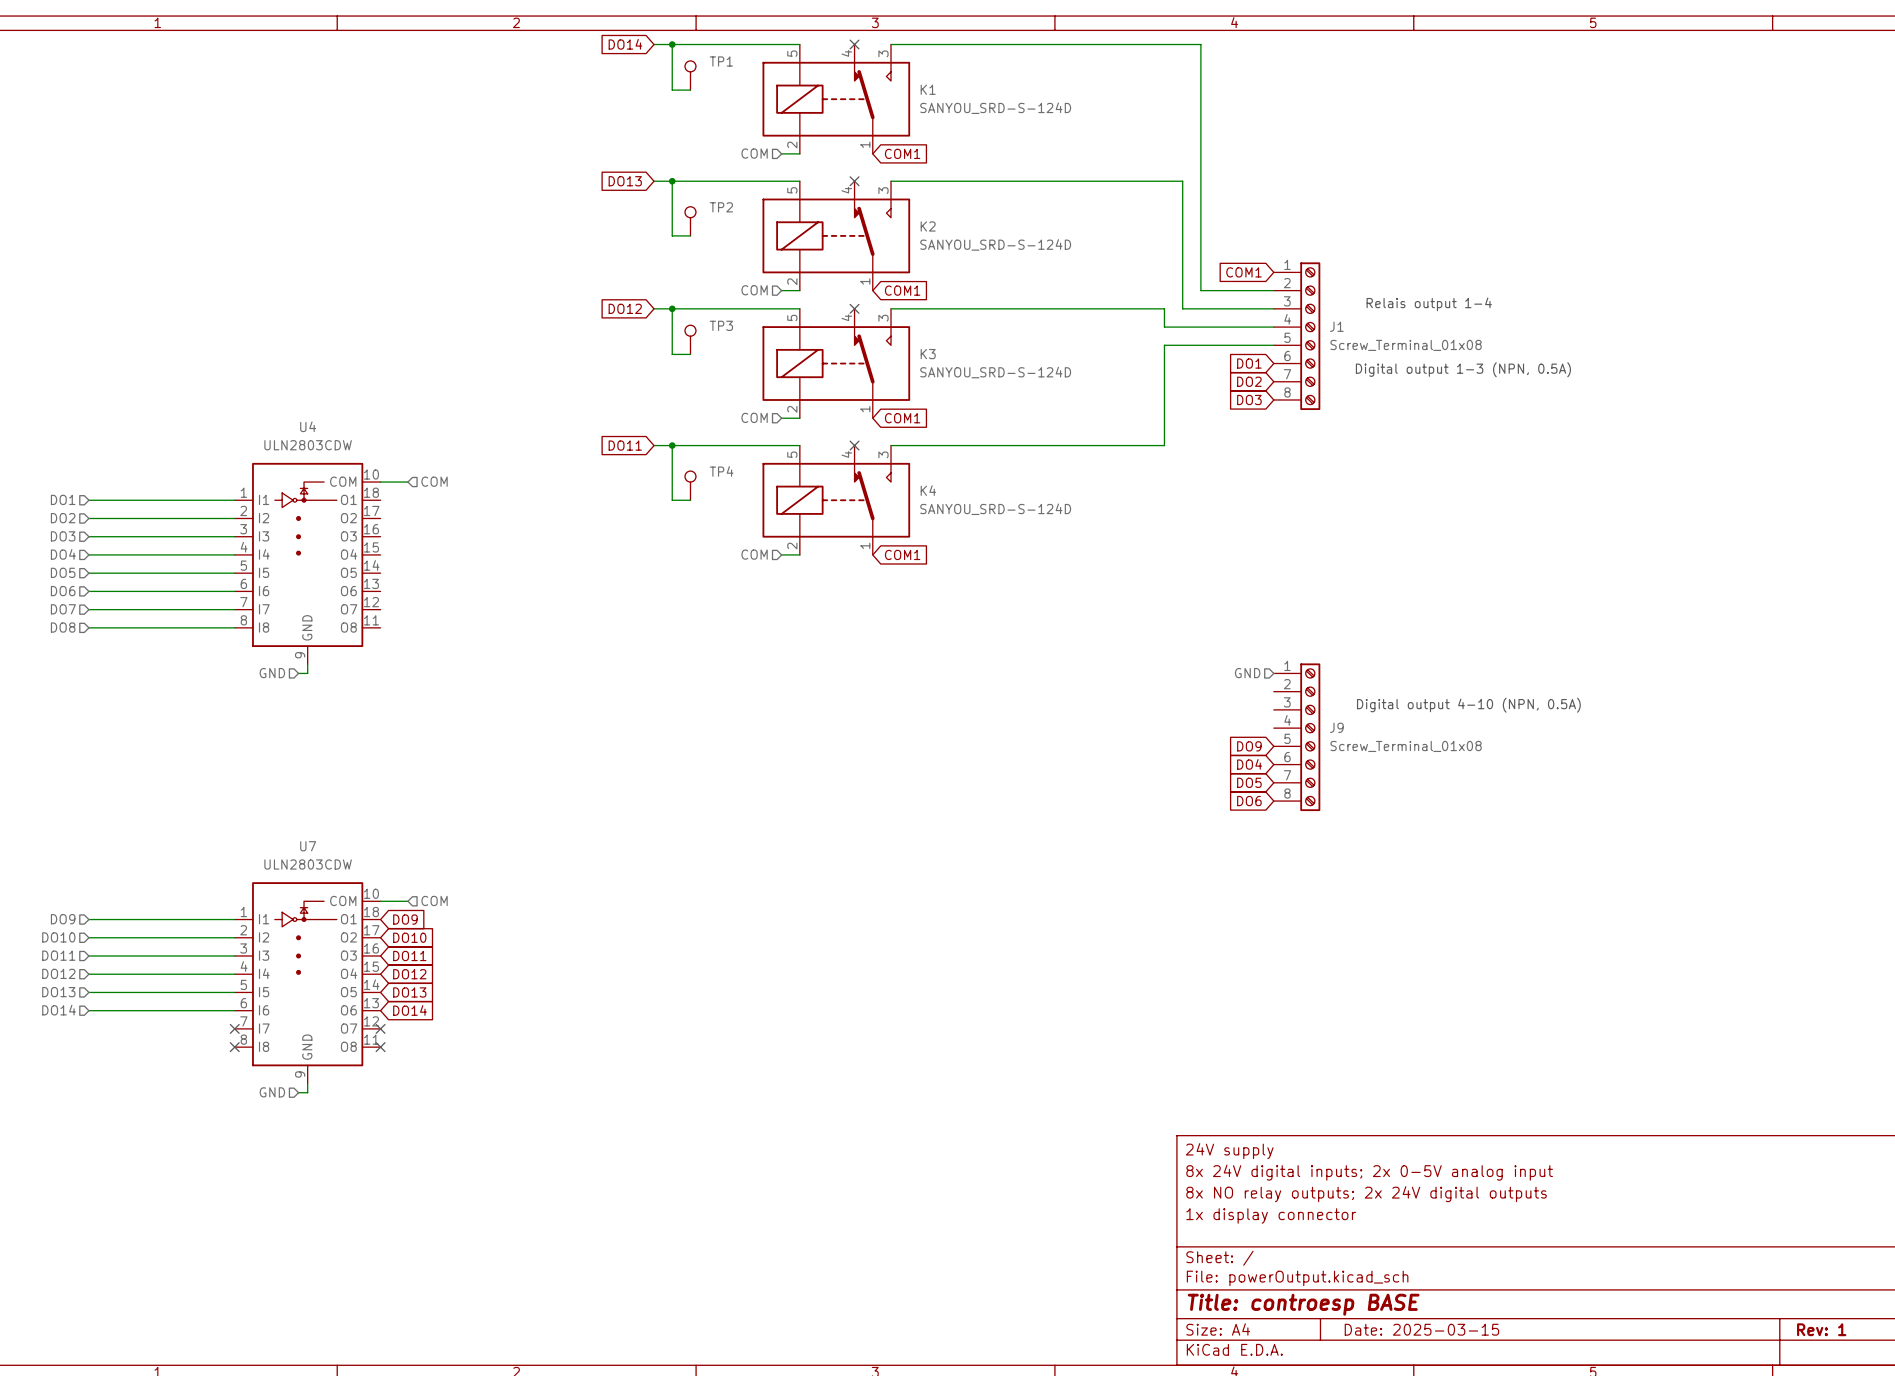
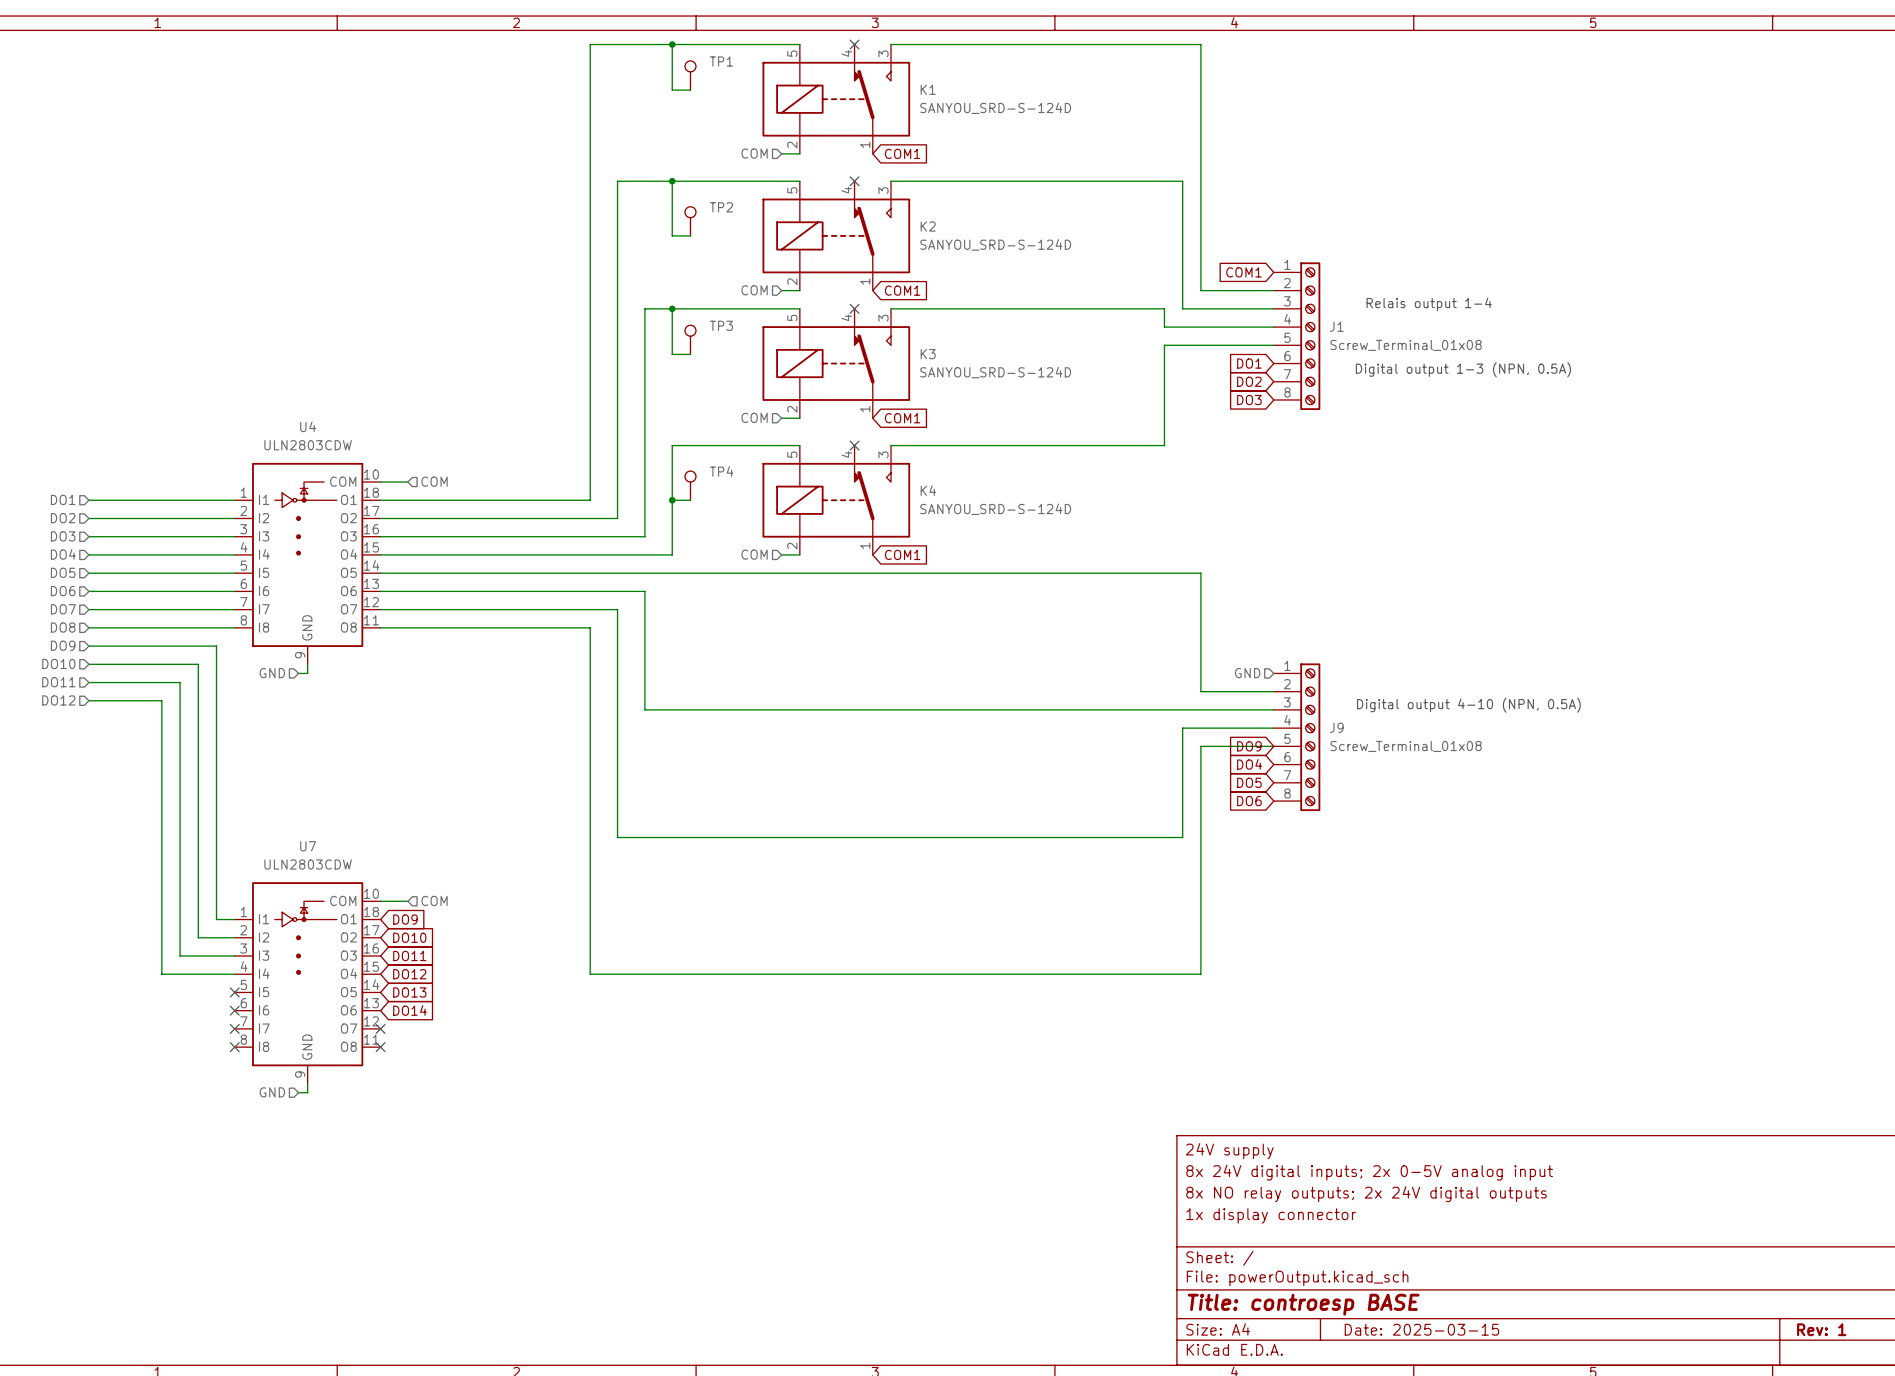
global label: DO14 (625, 44) -> none
wire: none -> (654, 44) (590, 44) (590, 500) (380, 500)
global label: DO13 (625, 181) -> none
wire: none -> (654, 181) (617, 181) (617, 518) (380, 518)
global label: DO12 (625, 308) -> none
wire: none -> (654, 308) (644, 308) (644, 536) (380, 536)
global label: DO11 (625, 445) -> none
wire: (654, 445) (672, 445) -> none
junction: (672, 445) -> none
wire: none -> (672, 500) (672, 554) (380, 554)
junction: none -> (672, 500)
wire: none -> (380, 573) (1200, 573) (1200, 691) (1273, 691)
wire: none -> (380, 591) (644, 591) (644, 709) (1273, 709)
wire: none -> (380, 609) (617, 609) (617, 837) (1182, 837) (1182, 728) (1273, 728)
wire: none -> (380, 627) (590, 627) (590, 974) (1200, 974) (1200, 746) (1273, 746)
hierarchical label: none -> DO9 (63, 645)
hierarchical label: none -> DO10 (58, 663)
hierarchical label: none -> DO11 (58, 682)
hierarchical label: none -> DO12 (58, 700)
hierarchical label: DO9 (63, 919) -> none
wire: (88, 919) (216, 919) -> (88, 646) (216, 646) (216, 919)
hierarchical label: DO10 (58, 937) -> none
wire: (88, 937) (198, 937) -> (88, 664) (198, 664) (198, 937)
hierarchical label: DO11 (58, 955) -> none
wire: (88, 955) (180, 955) -> (88, 682) (180, 682) (180, 955)
hierarchical label: DO12 (58, 973) -> none
wire: (88, 974) (161, 974) -> (88, 700) (161, 700) (161, 974)
hierarchical label: DO13 (58, 992) -> none
wire: (88, 992) (234, 992) -> none
no-connect mark: none -> (234, 992)
hierarchical label: DO14 (59, 1010) -> none
wire: (88, 1010) (234, 1010) -> none
no-connect mark: none -> (234, 1010)

